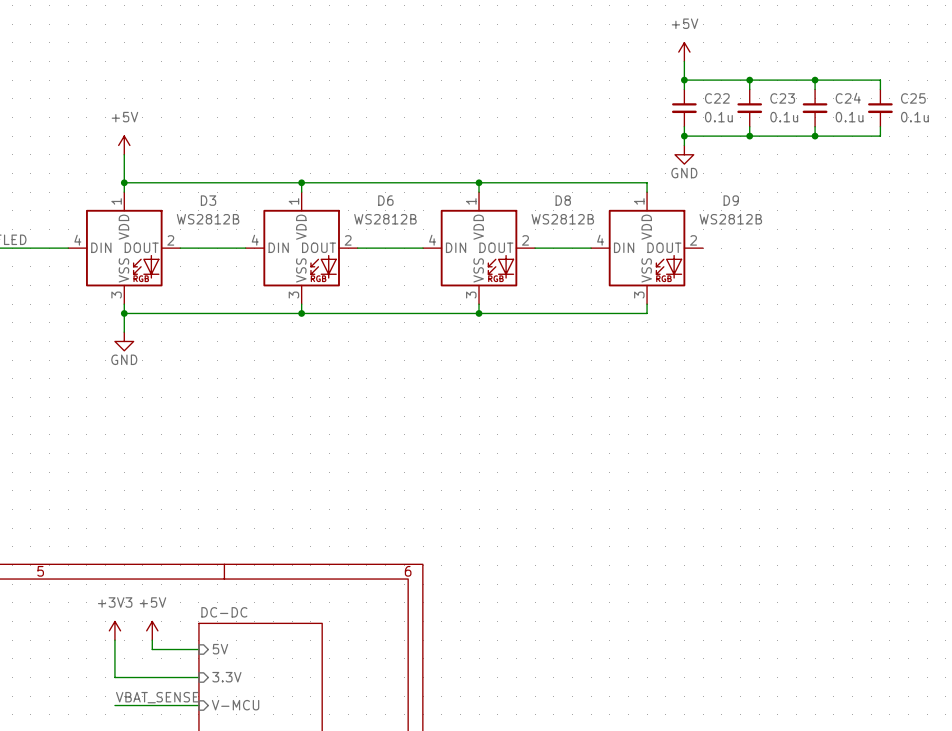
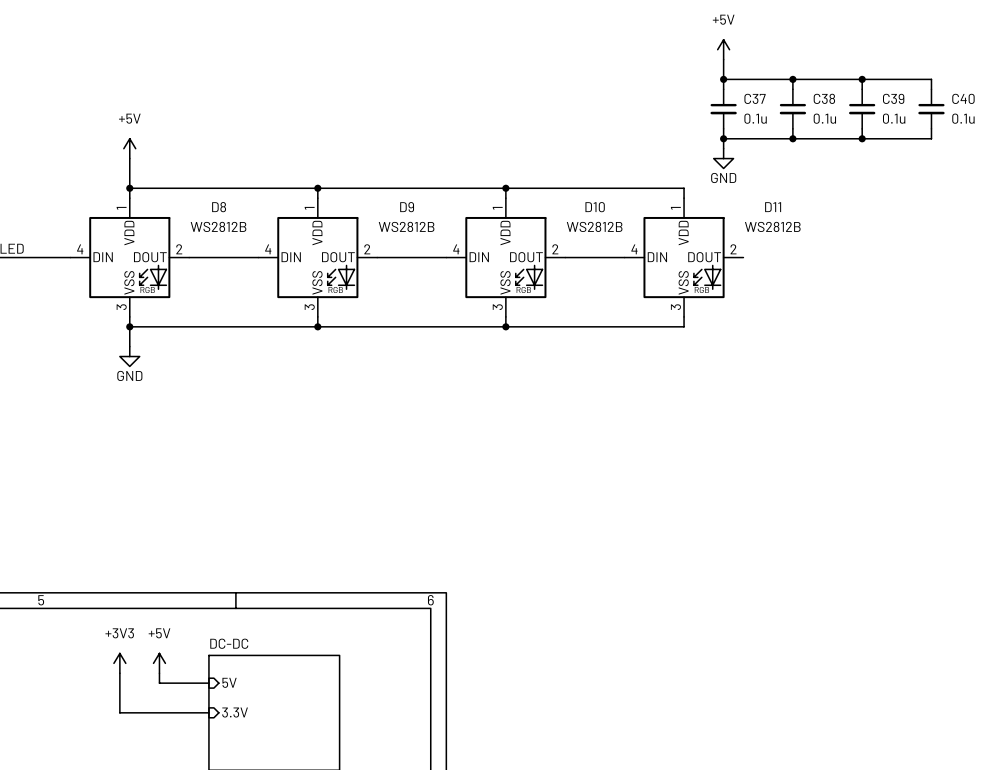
C22 name: C22 (717, 98) -> C37 (755, 98)
C23 name: C23 (782, 98) -> C38 (824, 98)
C24 name: C24 (848, 98) -> C39 (893, 98)
C25 name: C25 (913, 98) -> C40 (963, 98)
D3 name: D3 (208, 200) -> D8 (219, 207)
D6 name: D6 (385, 200) -> D9 (407, 207)
D8 name: D8 (563, 200) -> D10 (595, 207)
D9 name: D9 (731, 200) -> D11 (773, 207)
label: VBAT_SENSE (157, 697) -> none
wire: (114, 705) (198, 705) -> none
sheet pin: V-MCU (235, 705) -> none

